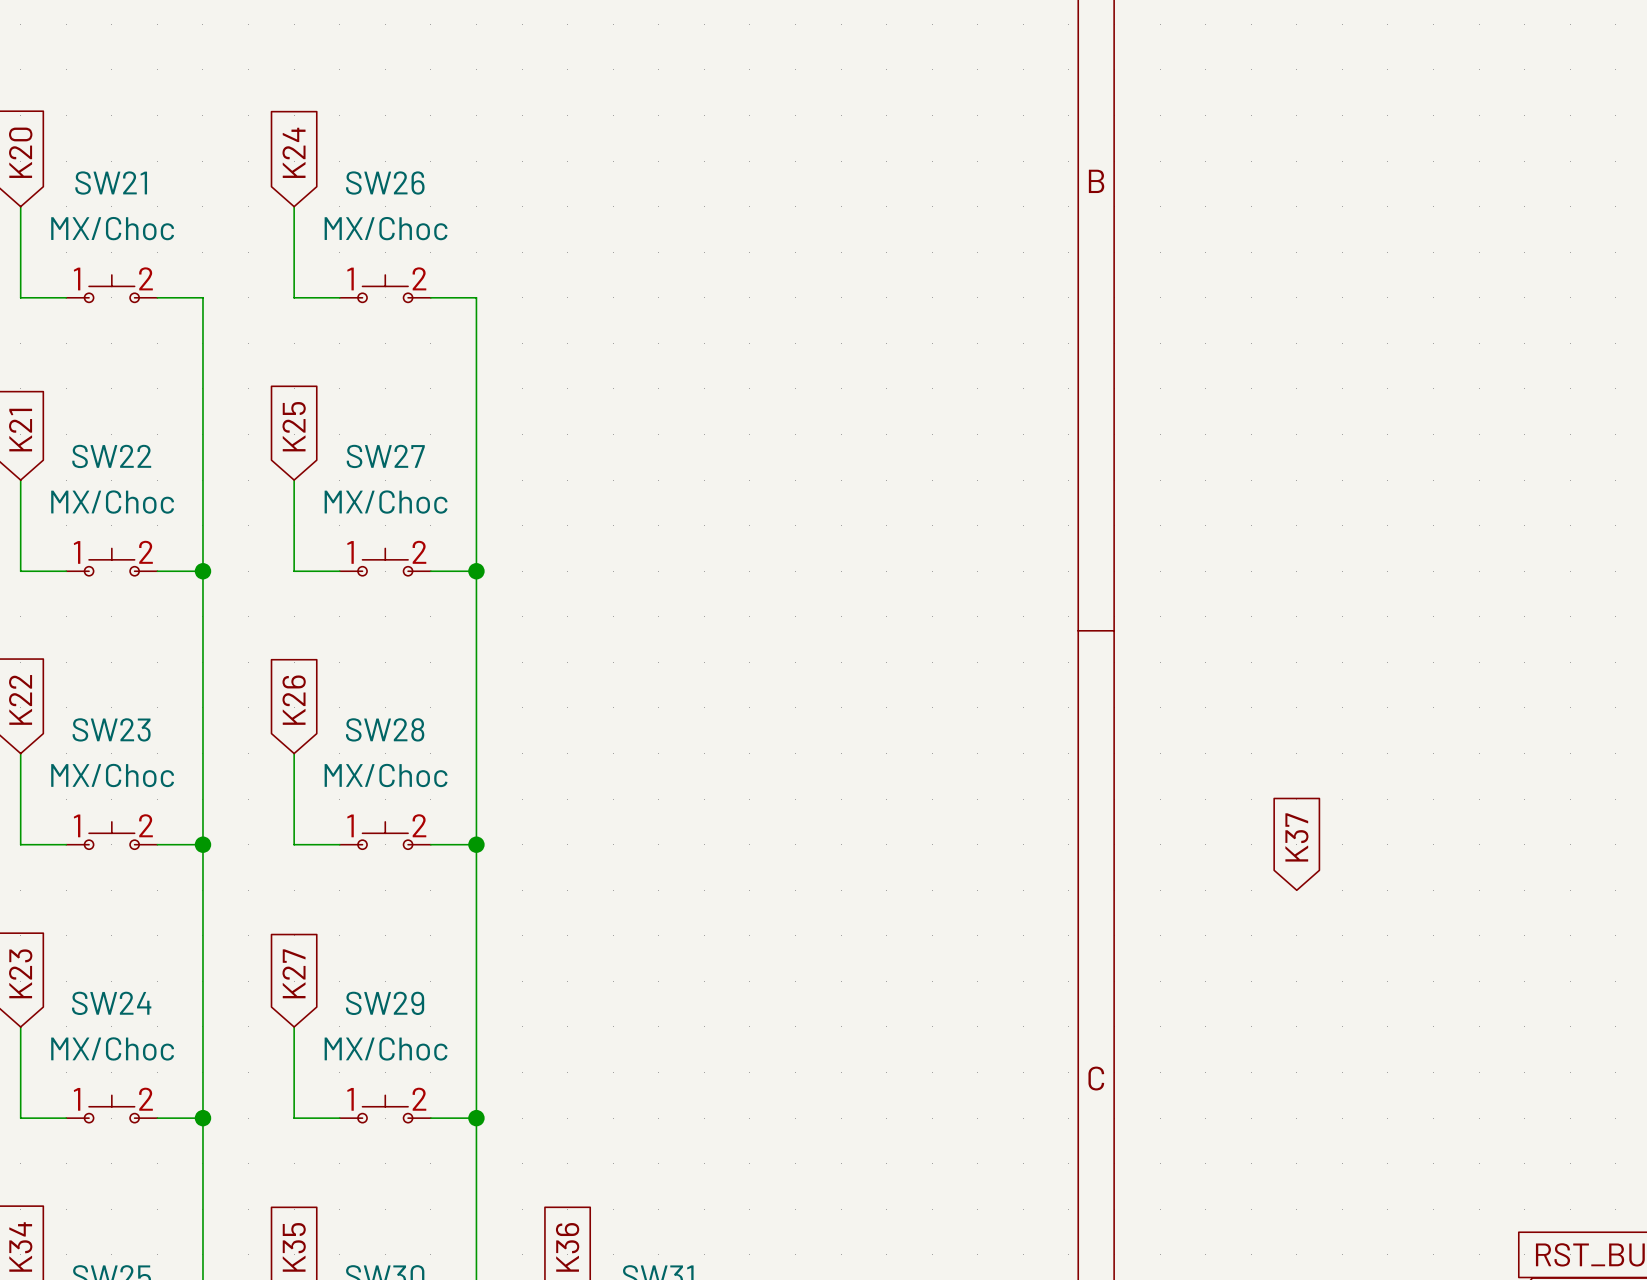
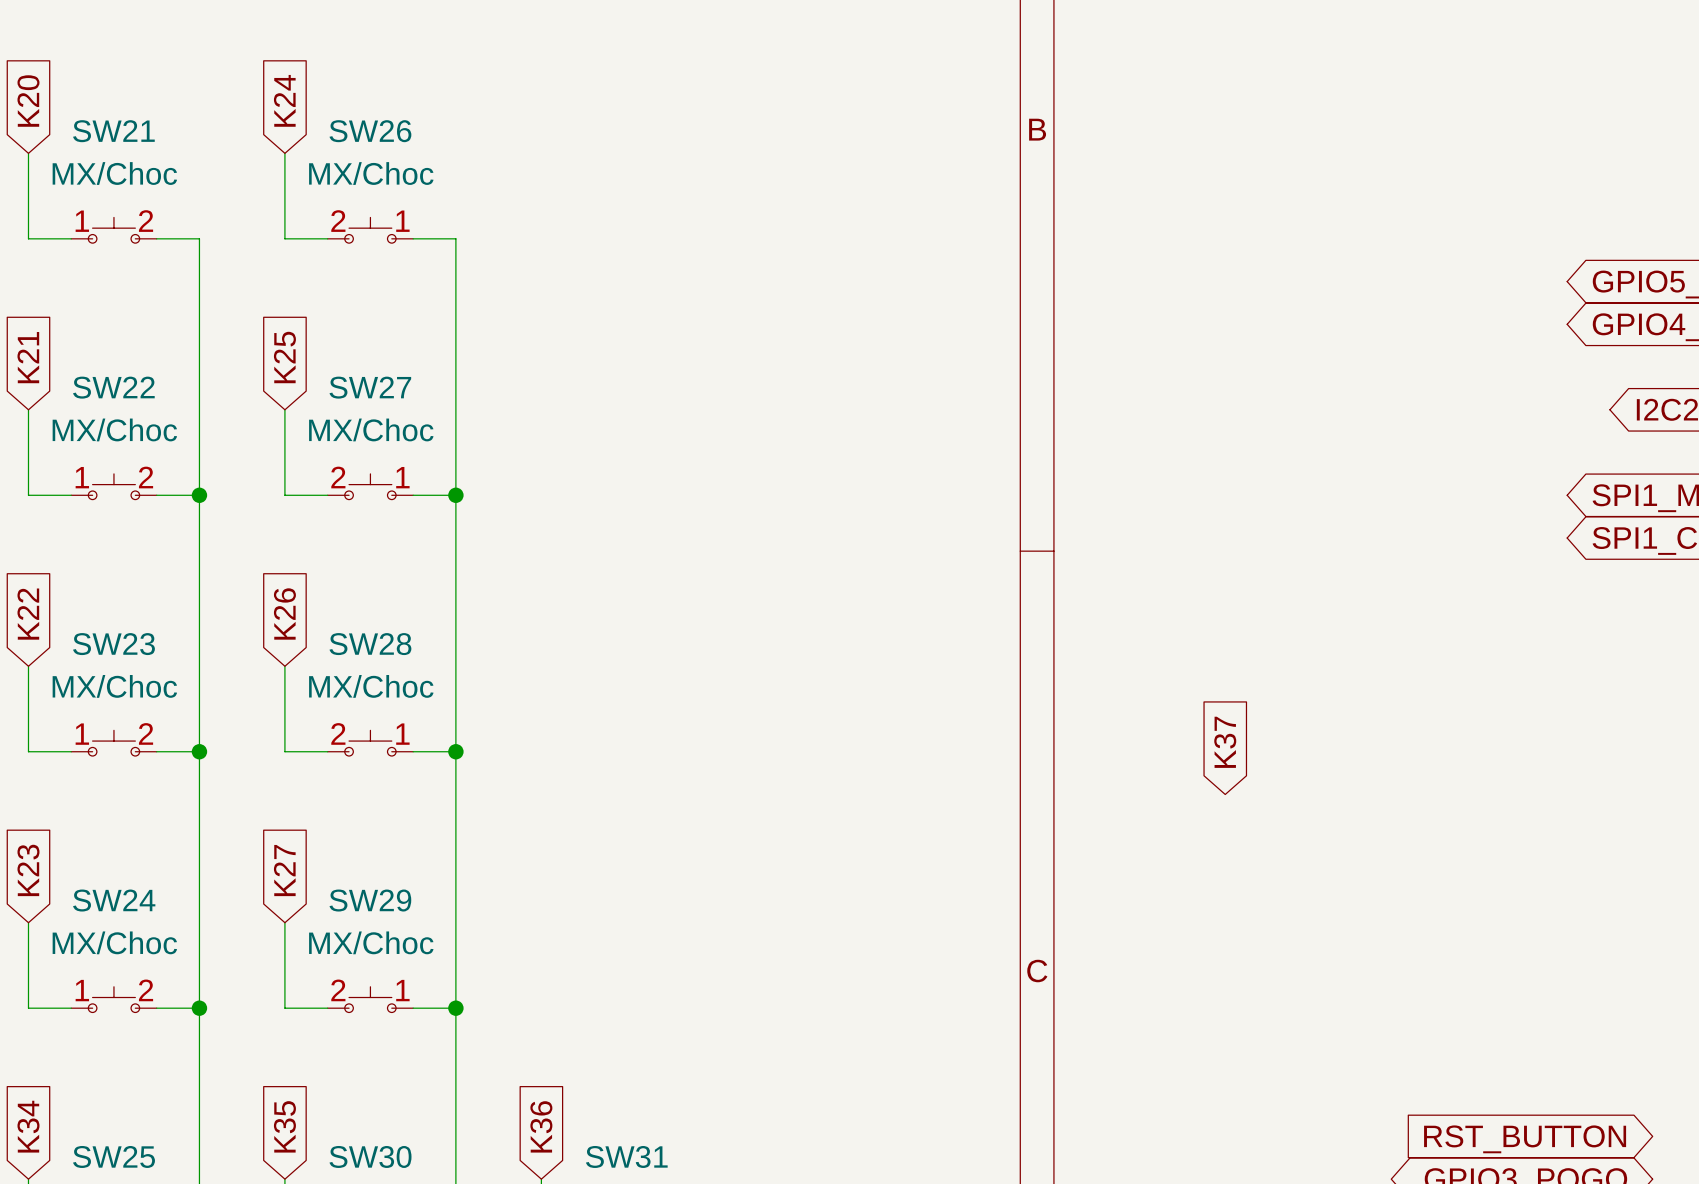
SW26 flip: as is (385, 288) -> left-right (370, 230)
SW27 flip: as is (385, 562) -> left-right (370, 486)
SW28 flip: as is (385, 835) -> left-right (370, 743)
SW29 flip: as is (385, 1109) -> left-right (370, 999)

